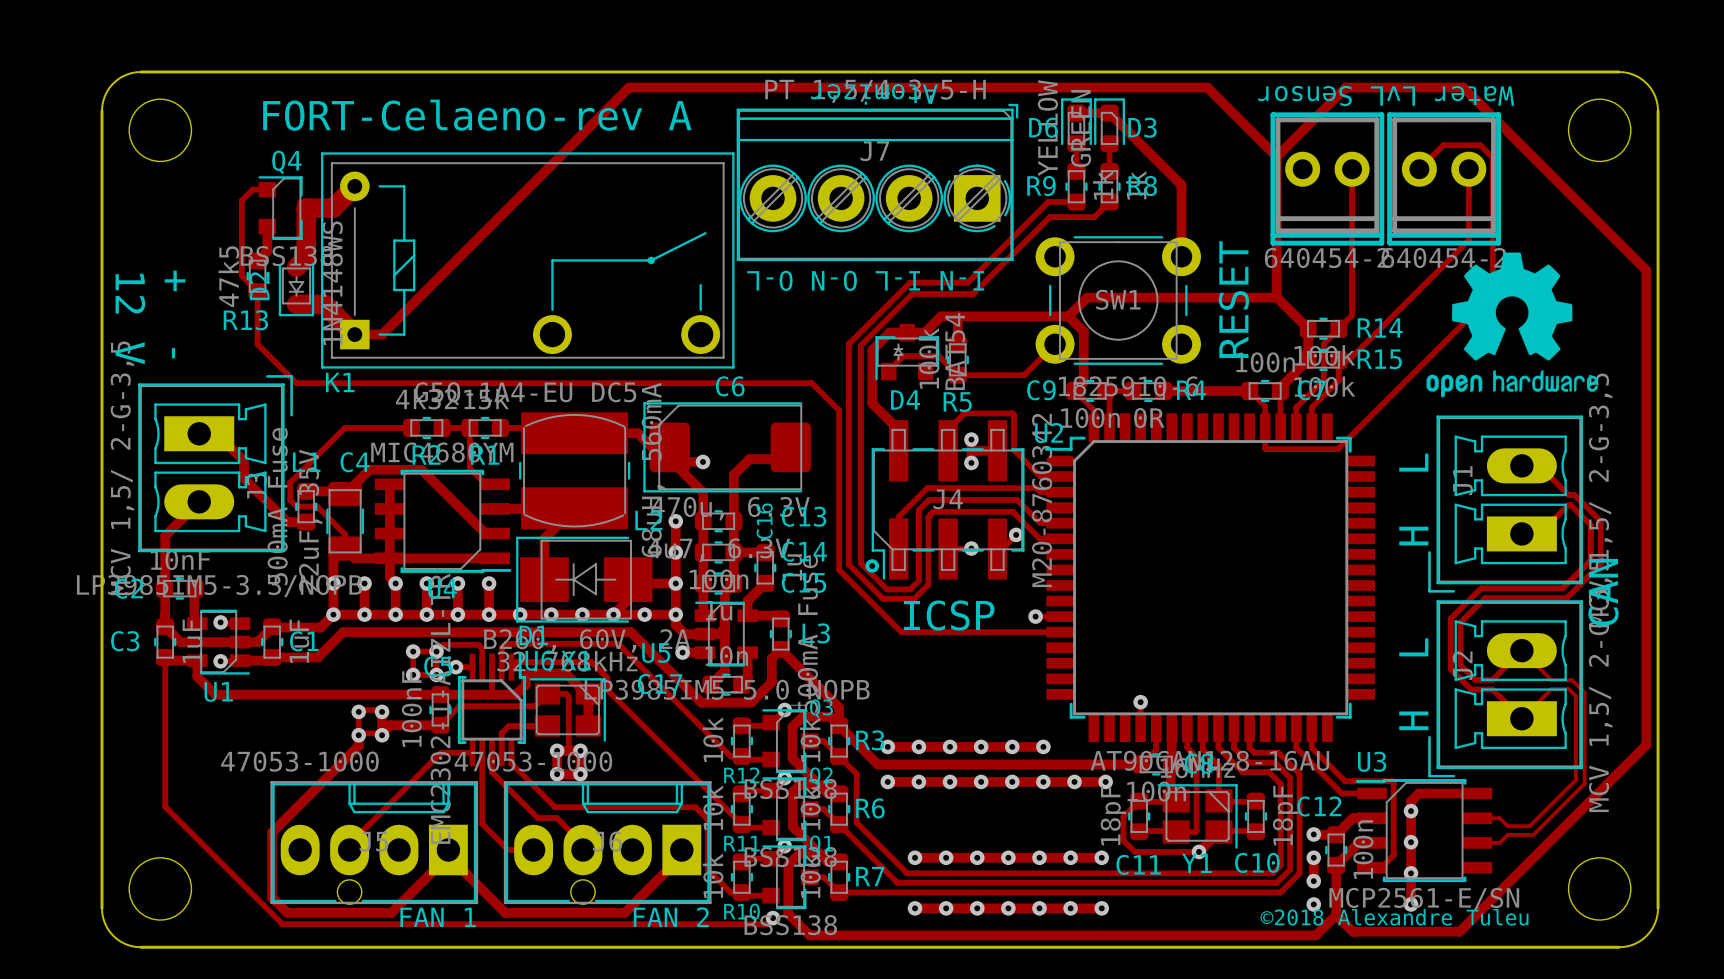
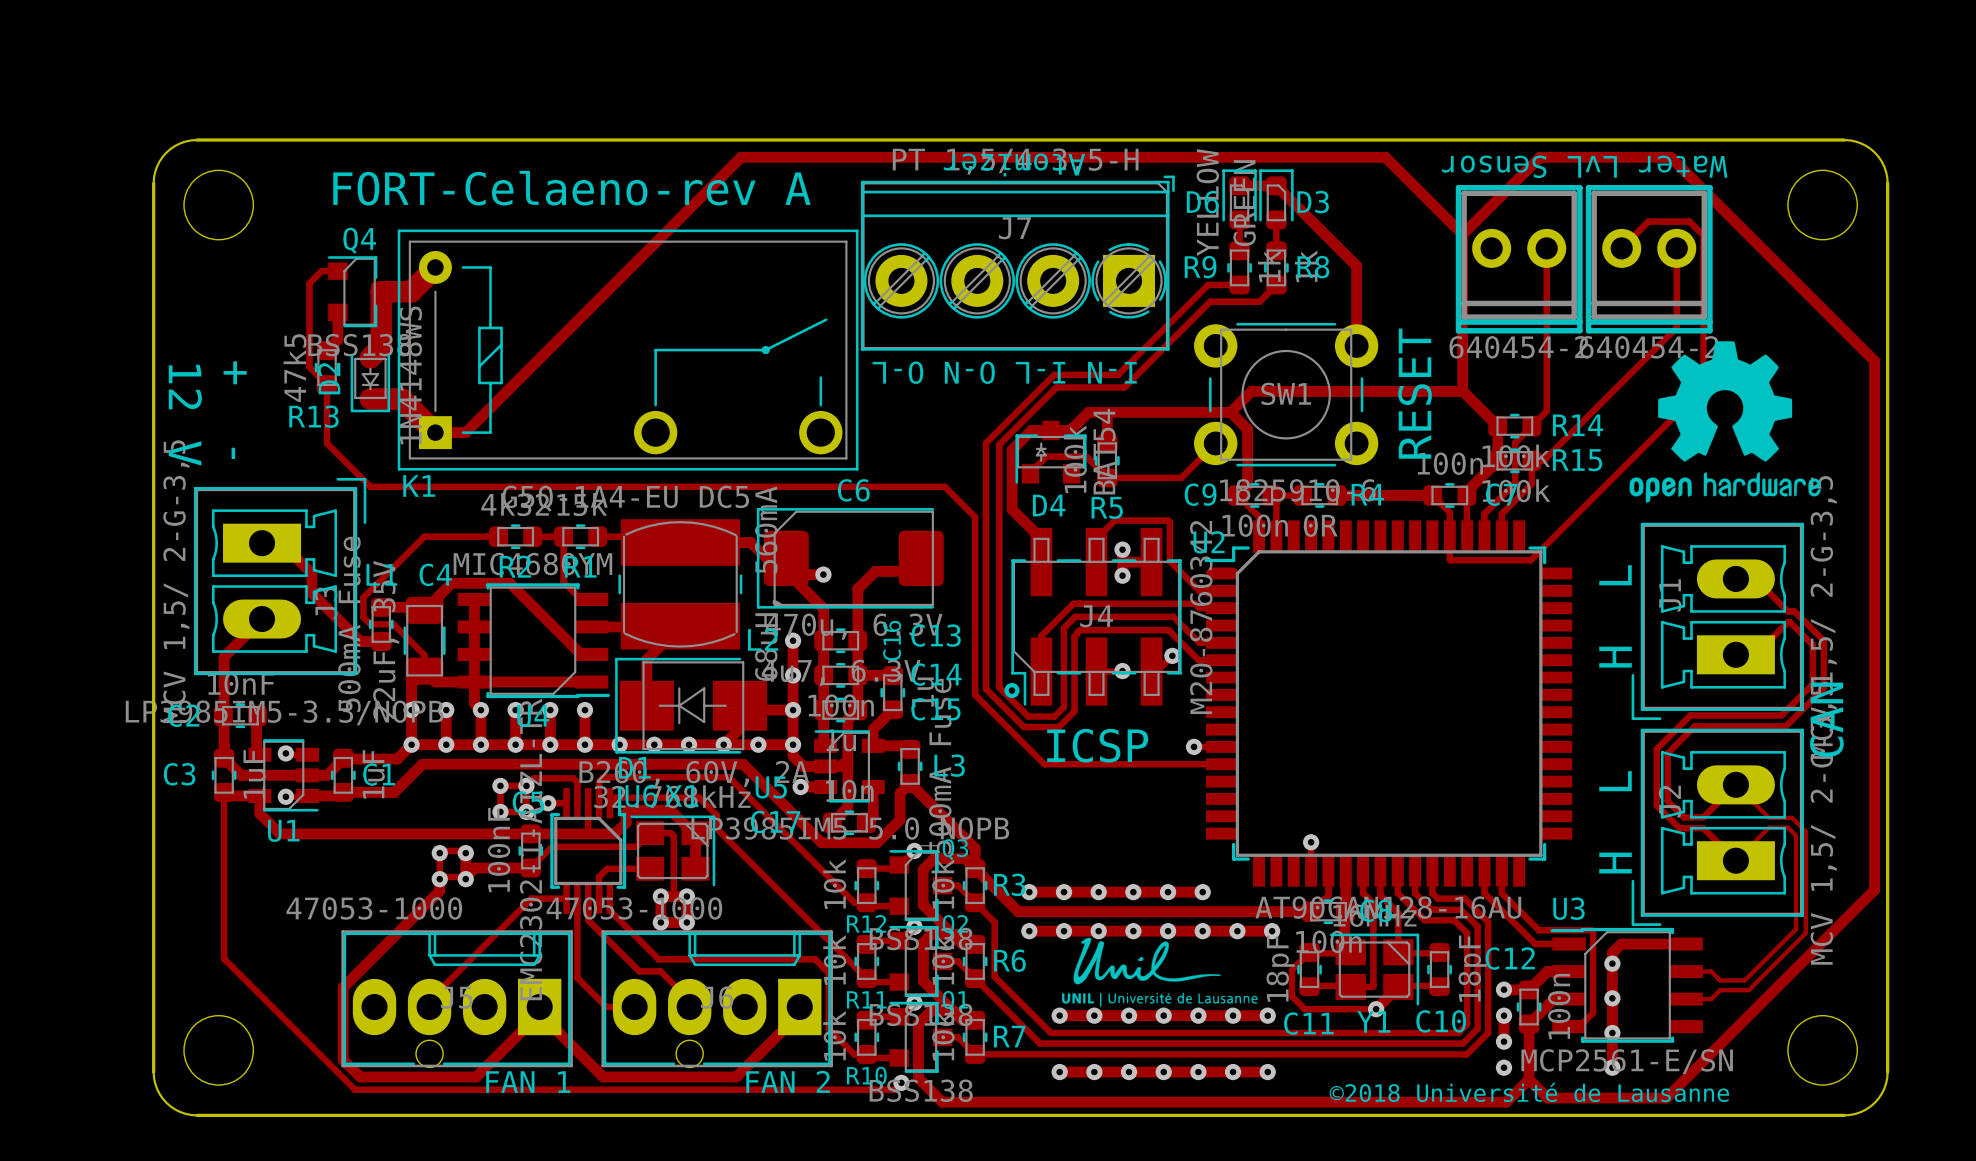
drawing: none -> [1062, 937, 1258, 1007]
text: ©2018 Alexandre Tuleu (1394, 917) -> none
text: none -> ©2018 Université de Lausanne (1529, 1092)

